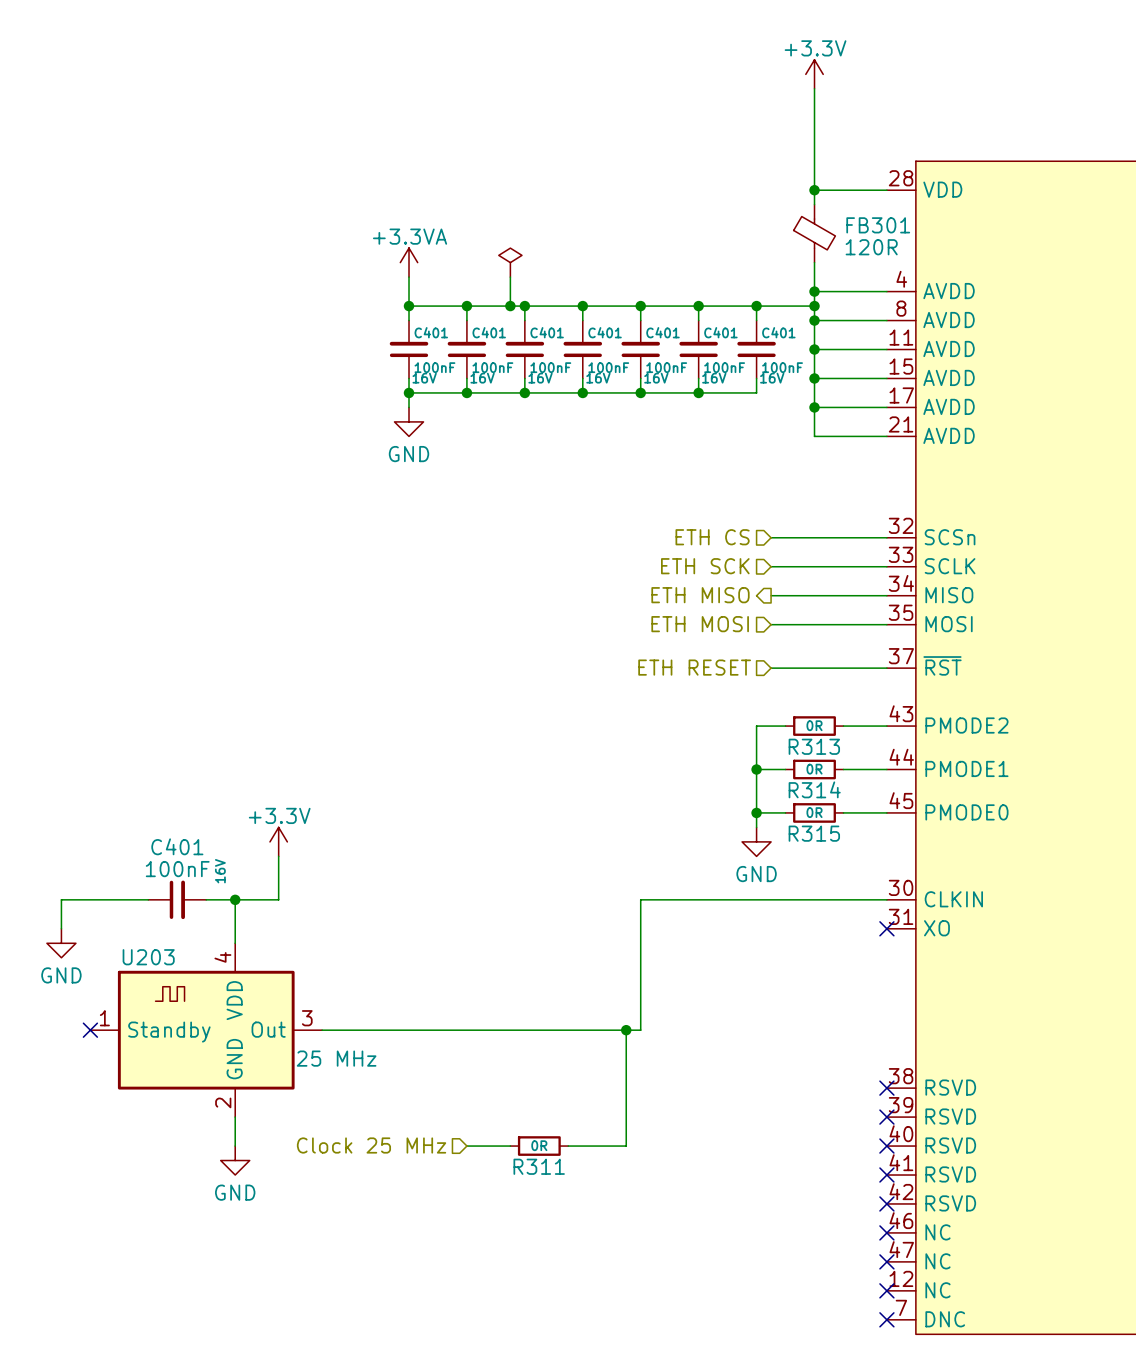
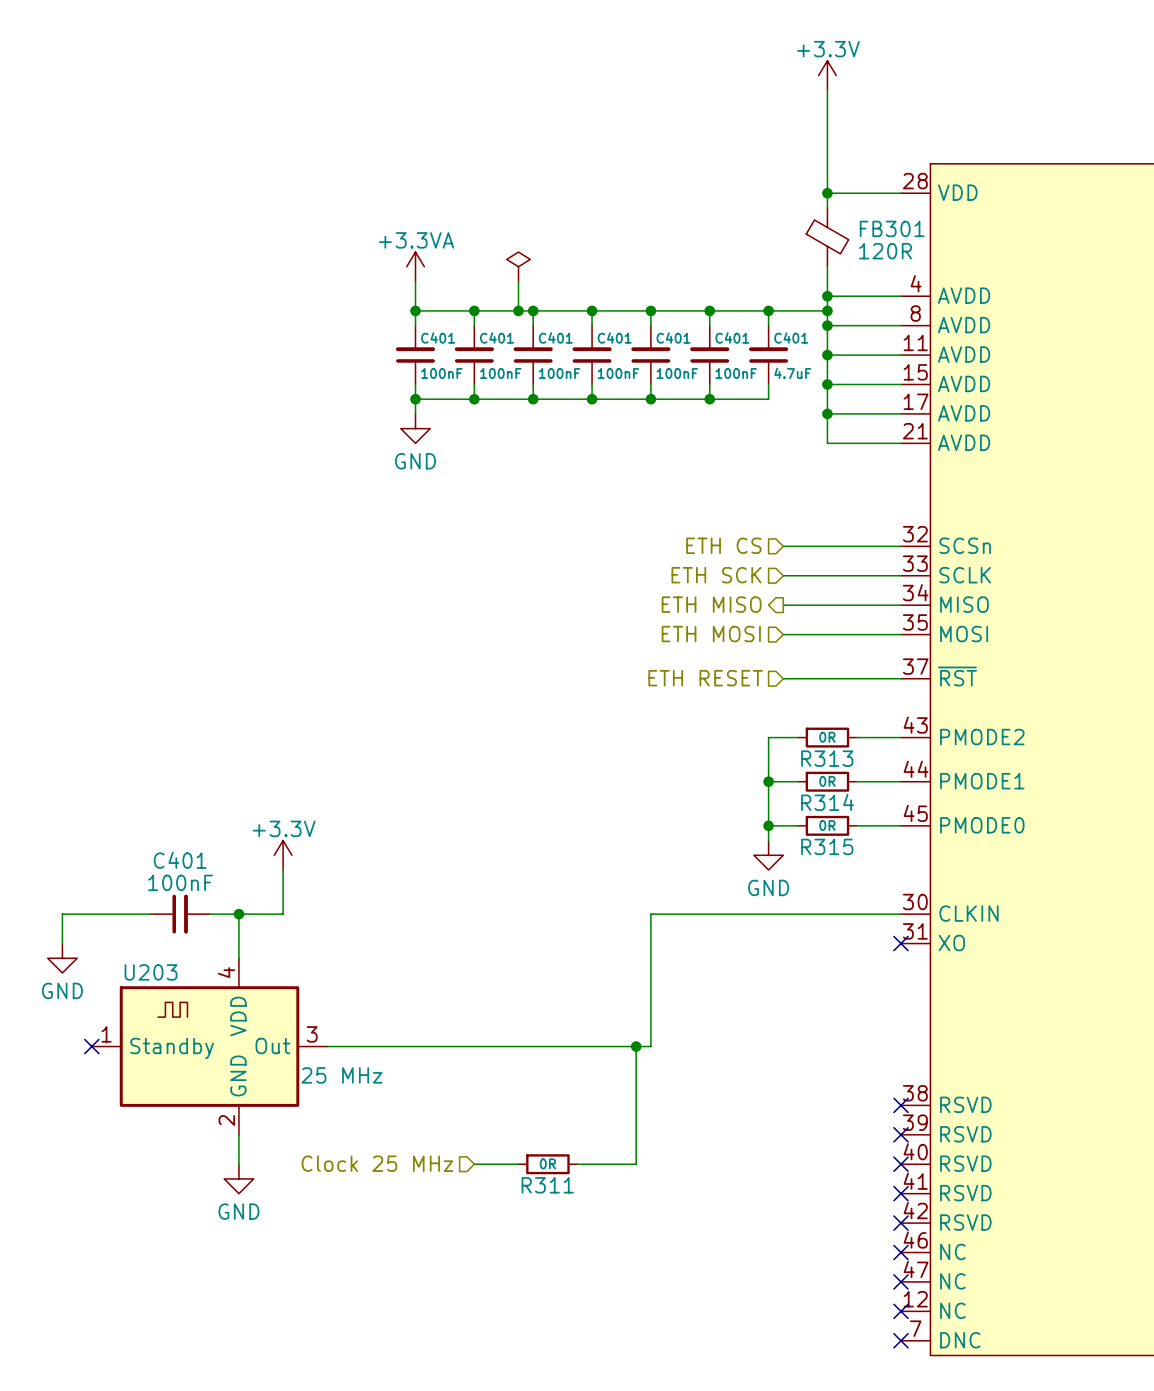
C401 value: 100nF (782, 367) -> 4.7uF (792, 373)
C401 text: 16V (424, 378) -> none
C401 text: 16V (482, 378) -> none
C401 text: 16V (540, 378) -> none
C401 text: 16V (598, 378) -> none
C401 text: 16V (656, 378) -> none
C401 text: 16V (714, 378) -> none
C401 text: 16V (772, 378) -> none
C401 text: 16V (220, 871) -> none

